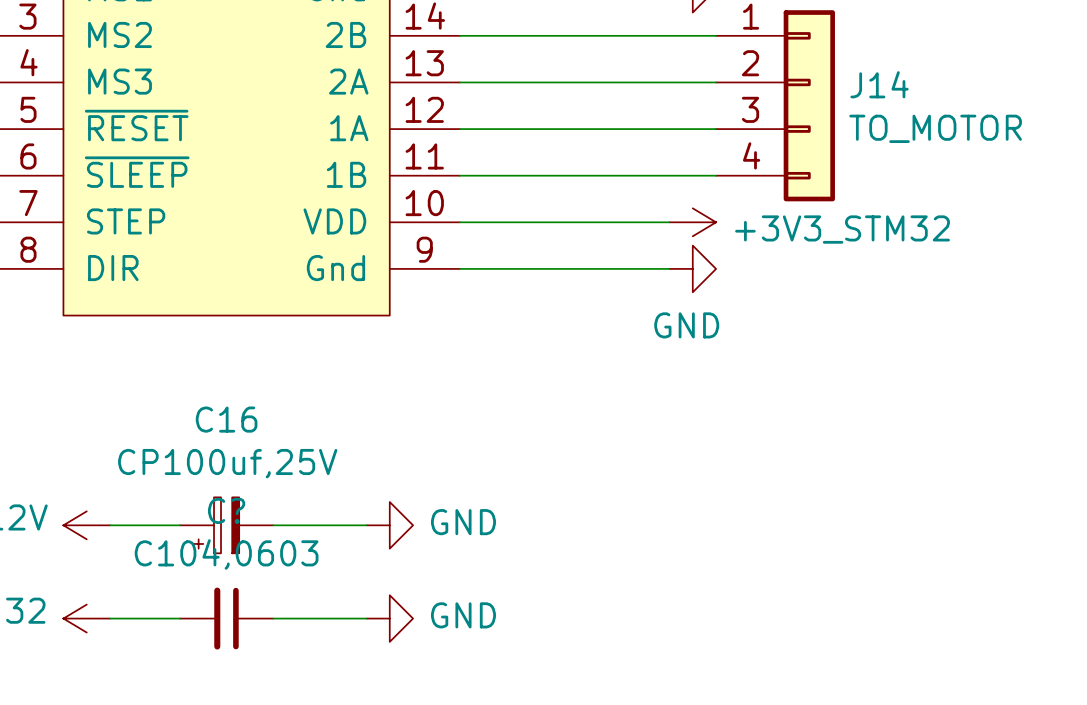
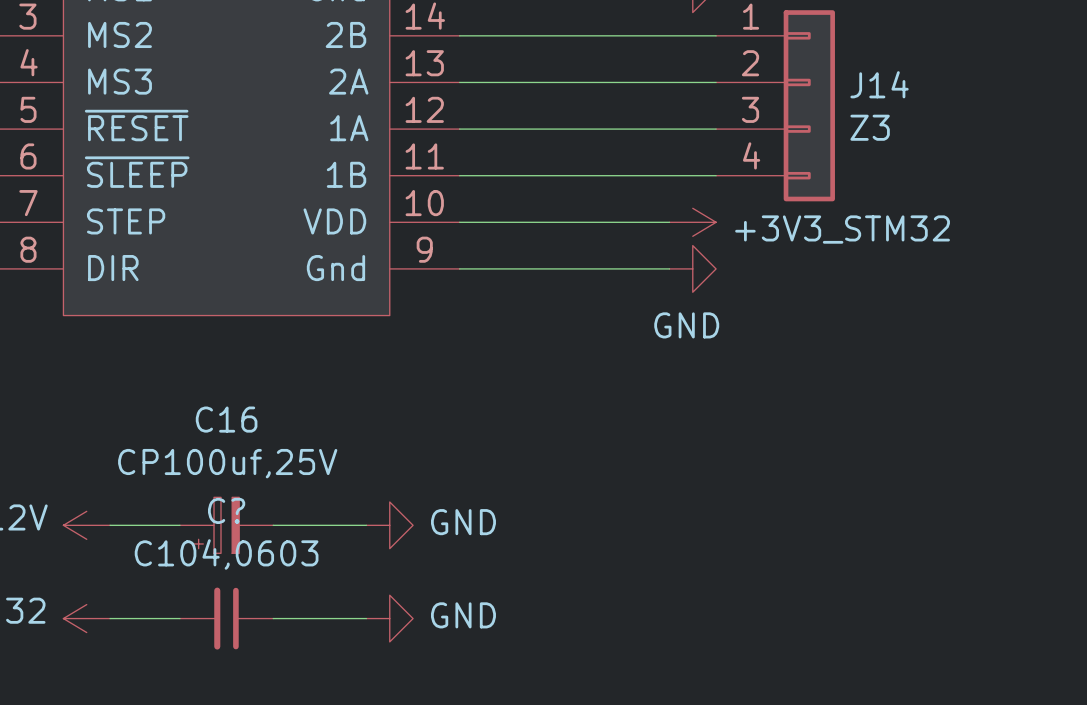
J14 value: TO_MOTOR (935, 128) -> Z3 (870, 127)

